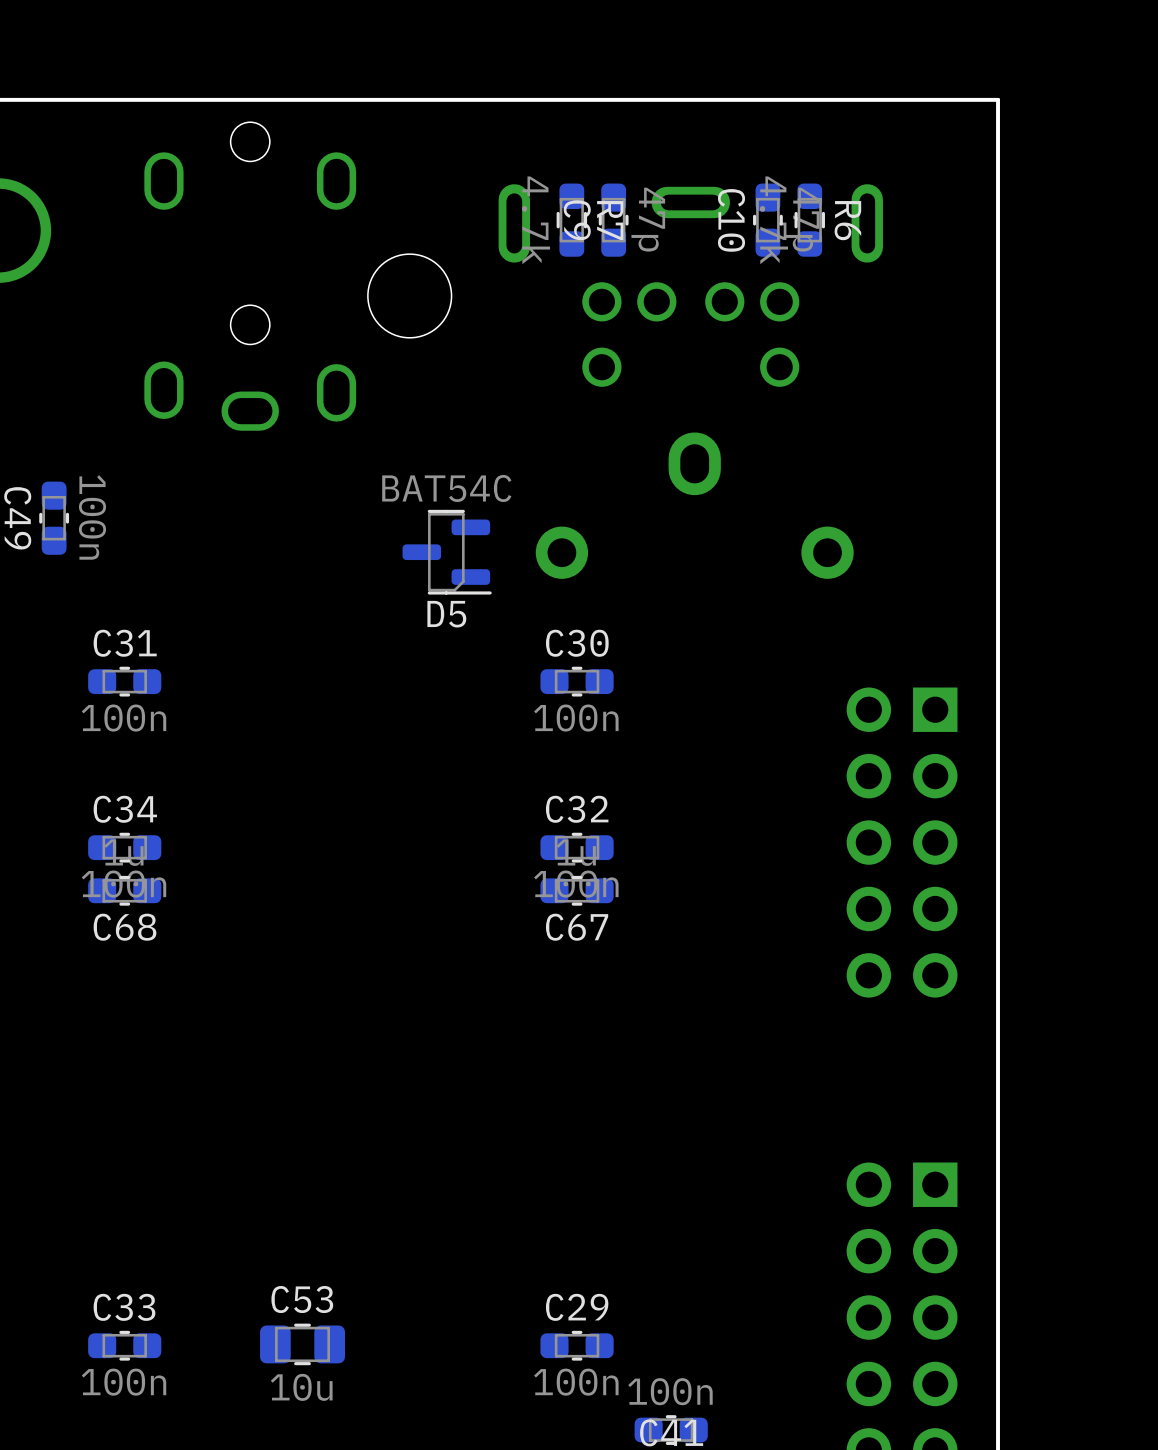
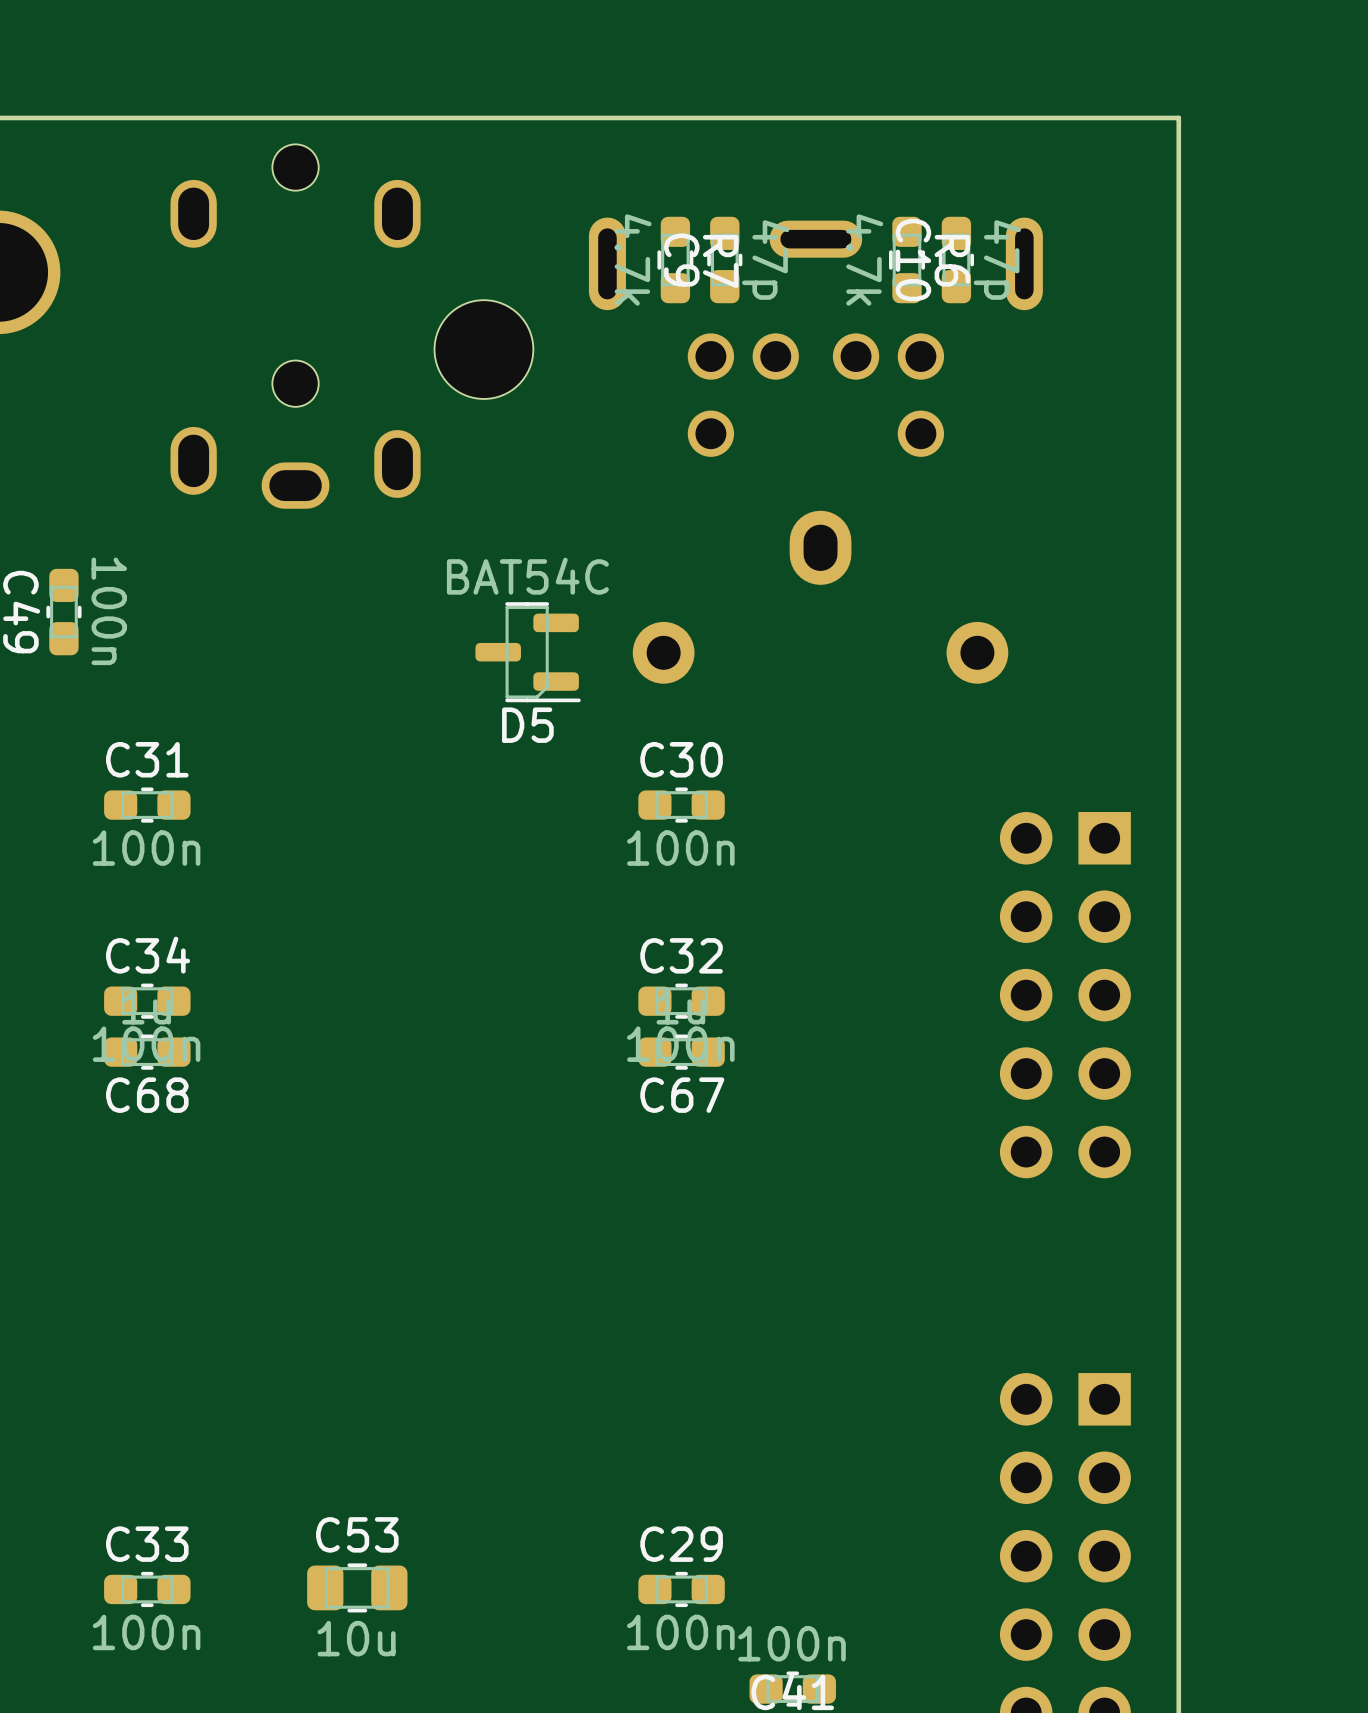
C10 position: (767, 220) -> (956, 260)
R6 position: (809, 220) -> (907, 260)

